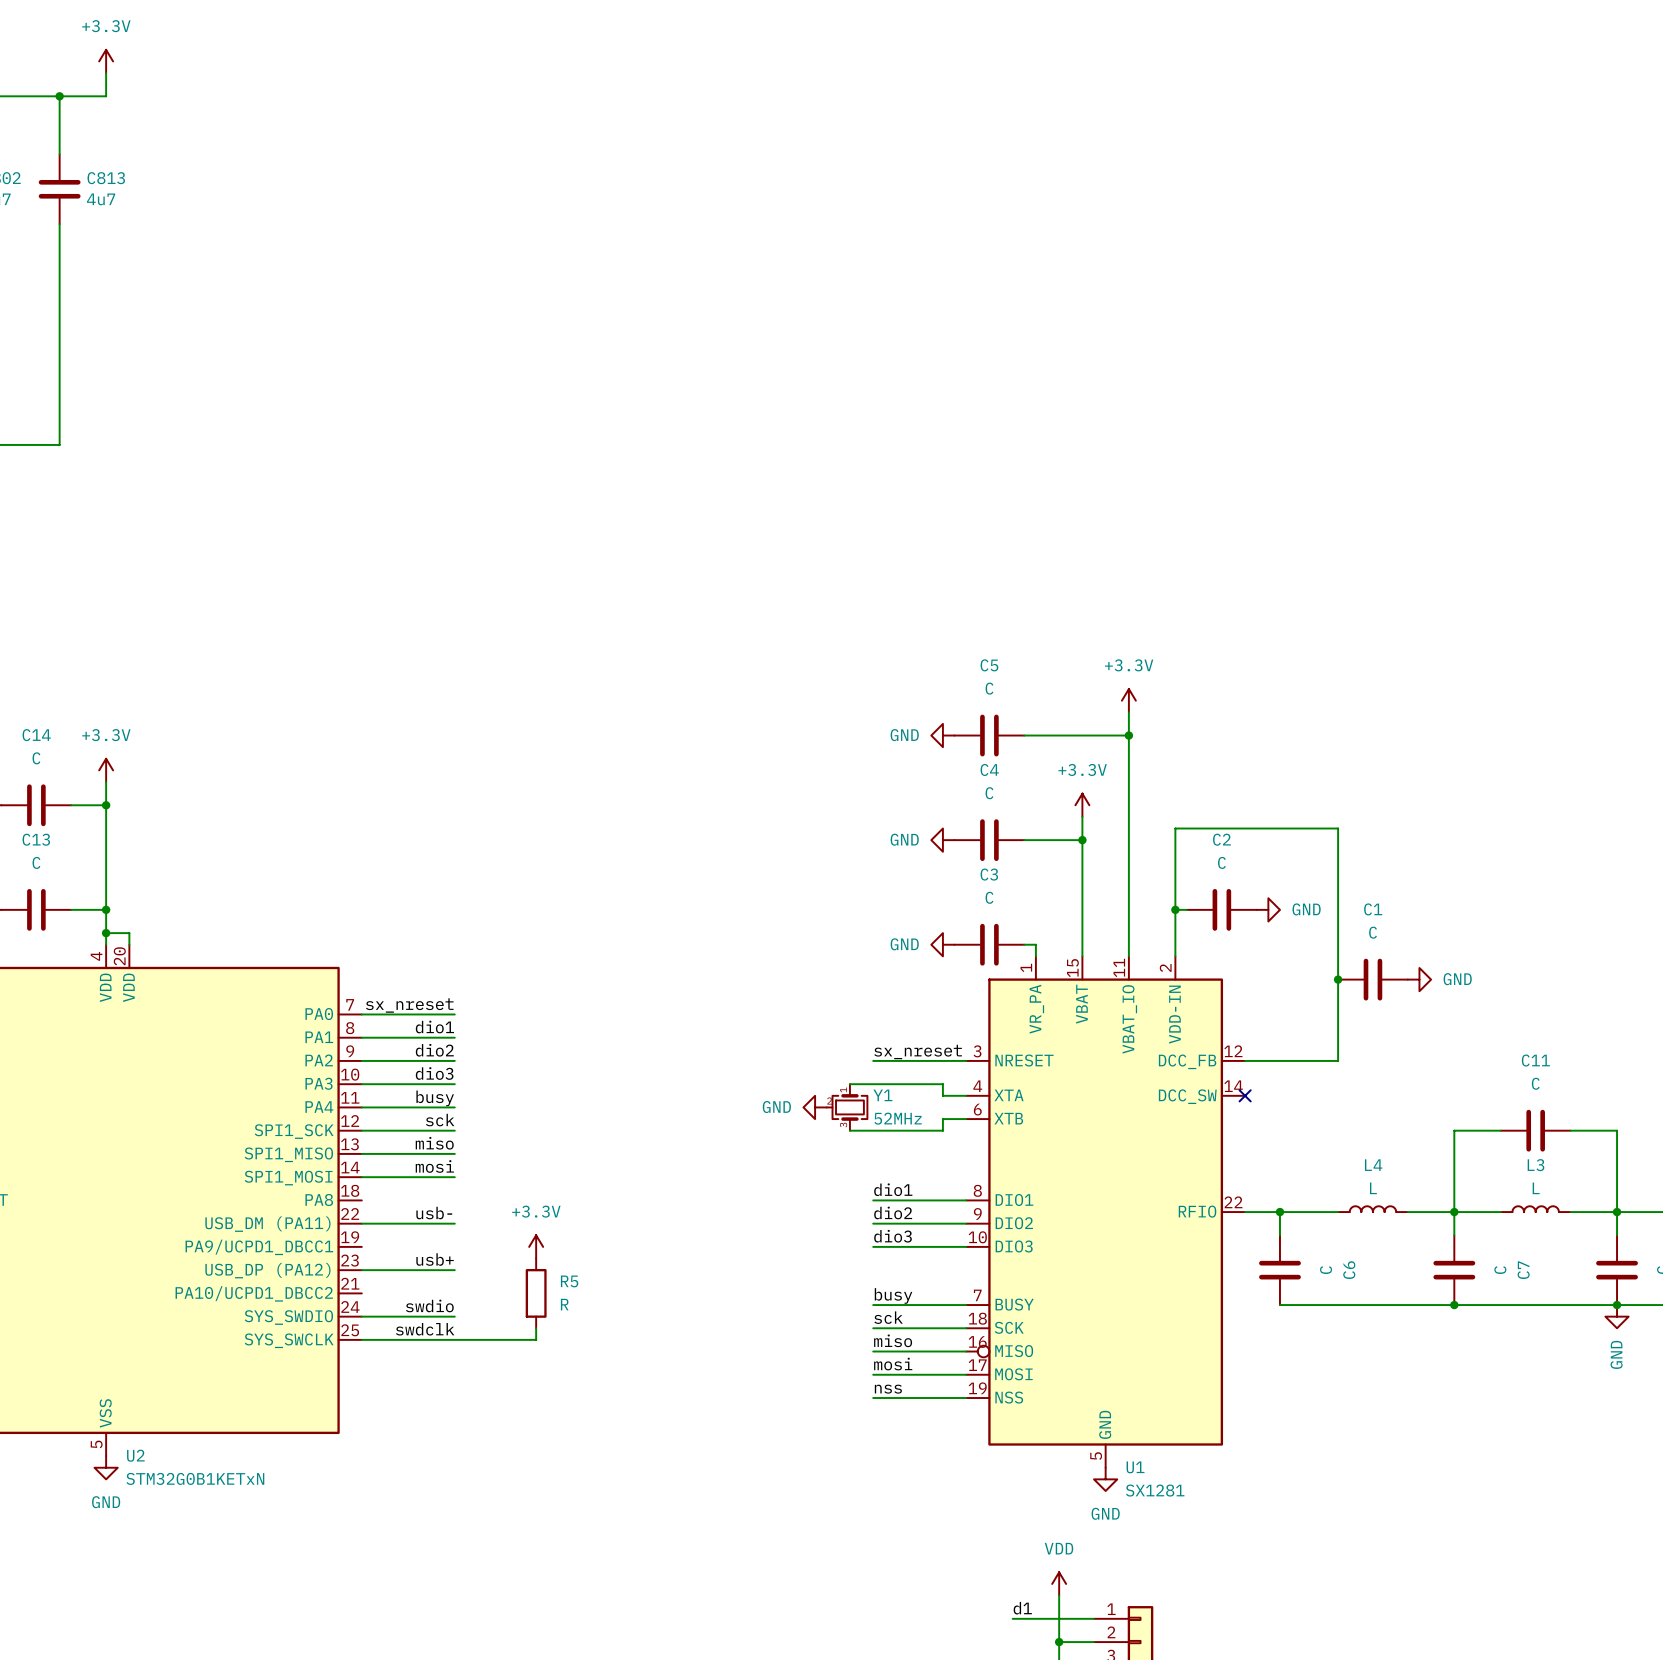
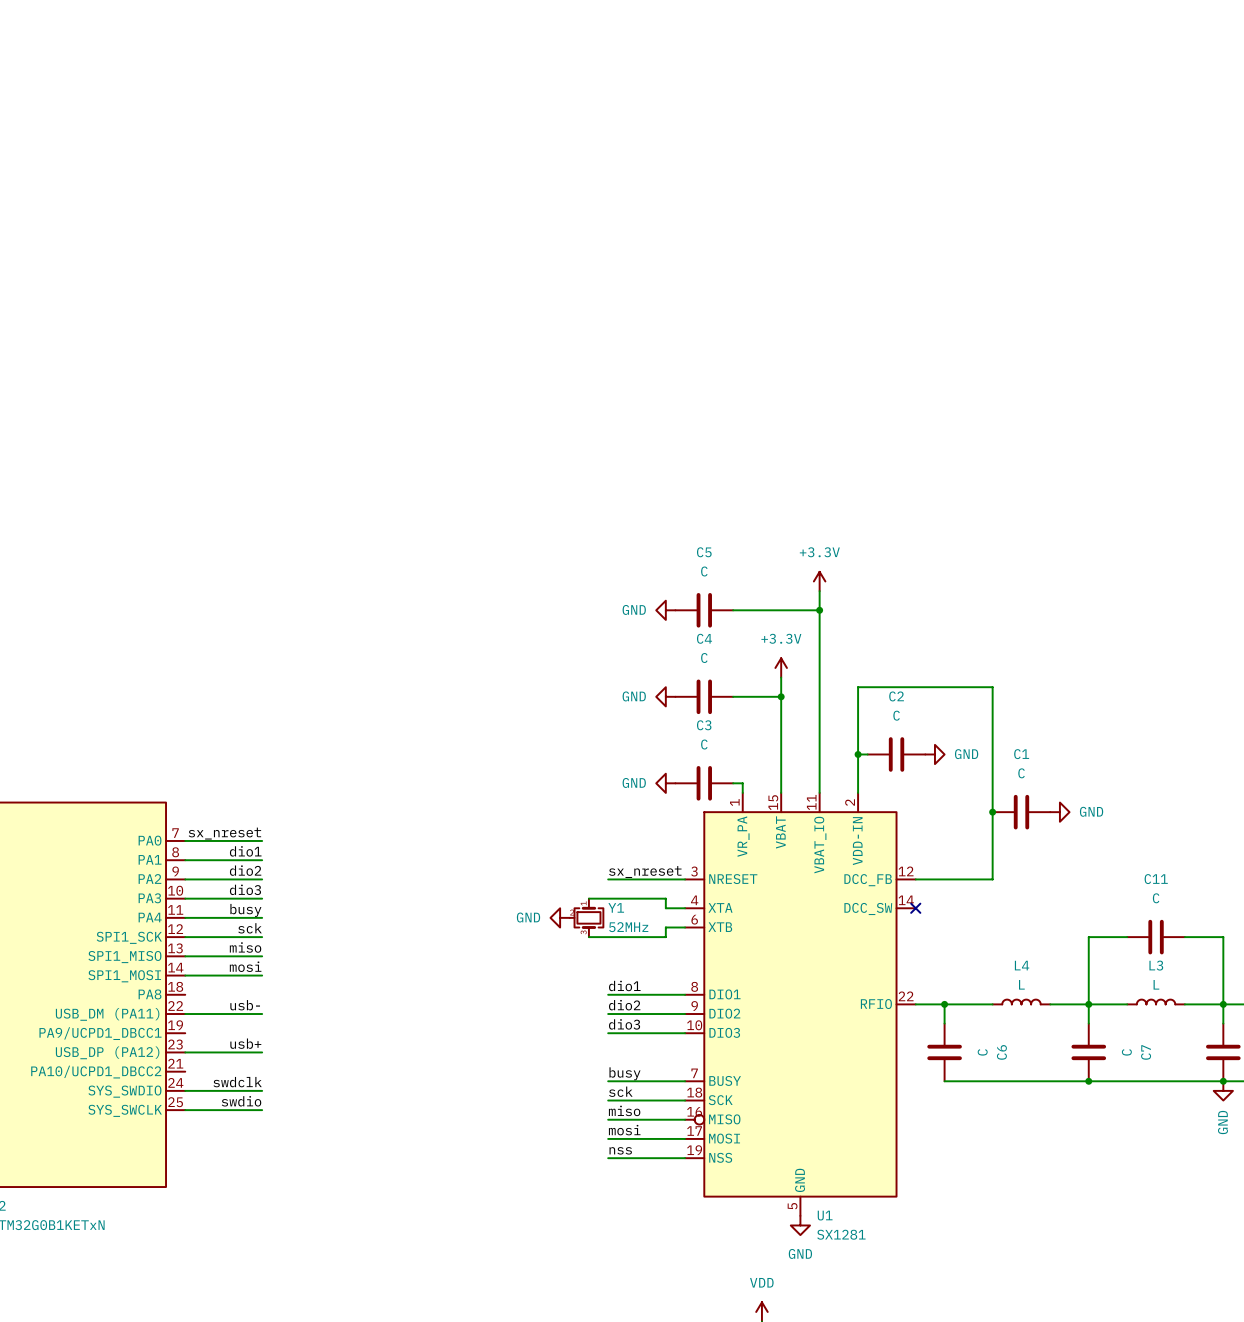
power symbol: +3.3V (536, 1246) -> none
R5: R (536, 1293) -> none
label: swdio (429, 1305) -> swdclk (237, 1082)
wire: (536, 1328) (536, 1339) (454, 1339) -> none
label: swdclk (425, 1329) -> swdio (241, 1101)

